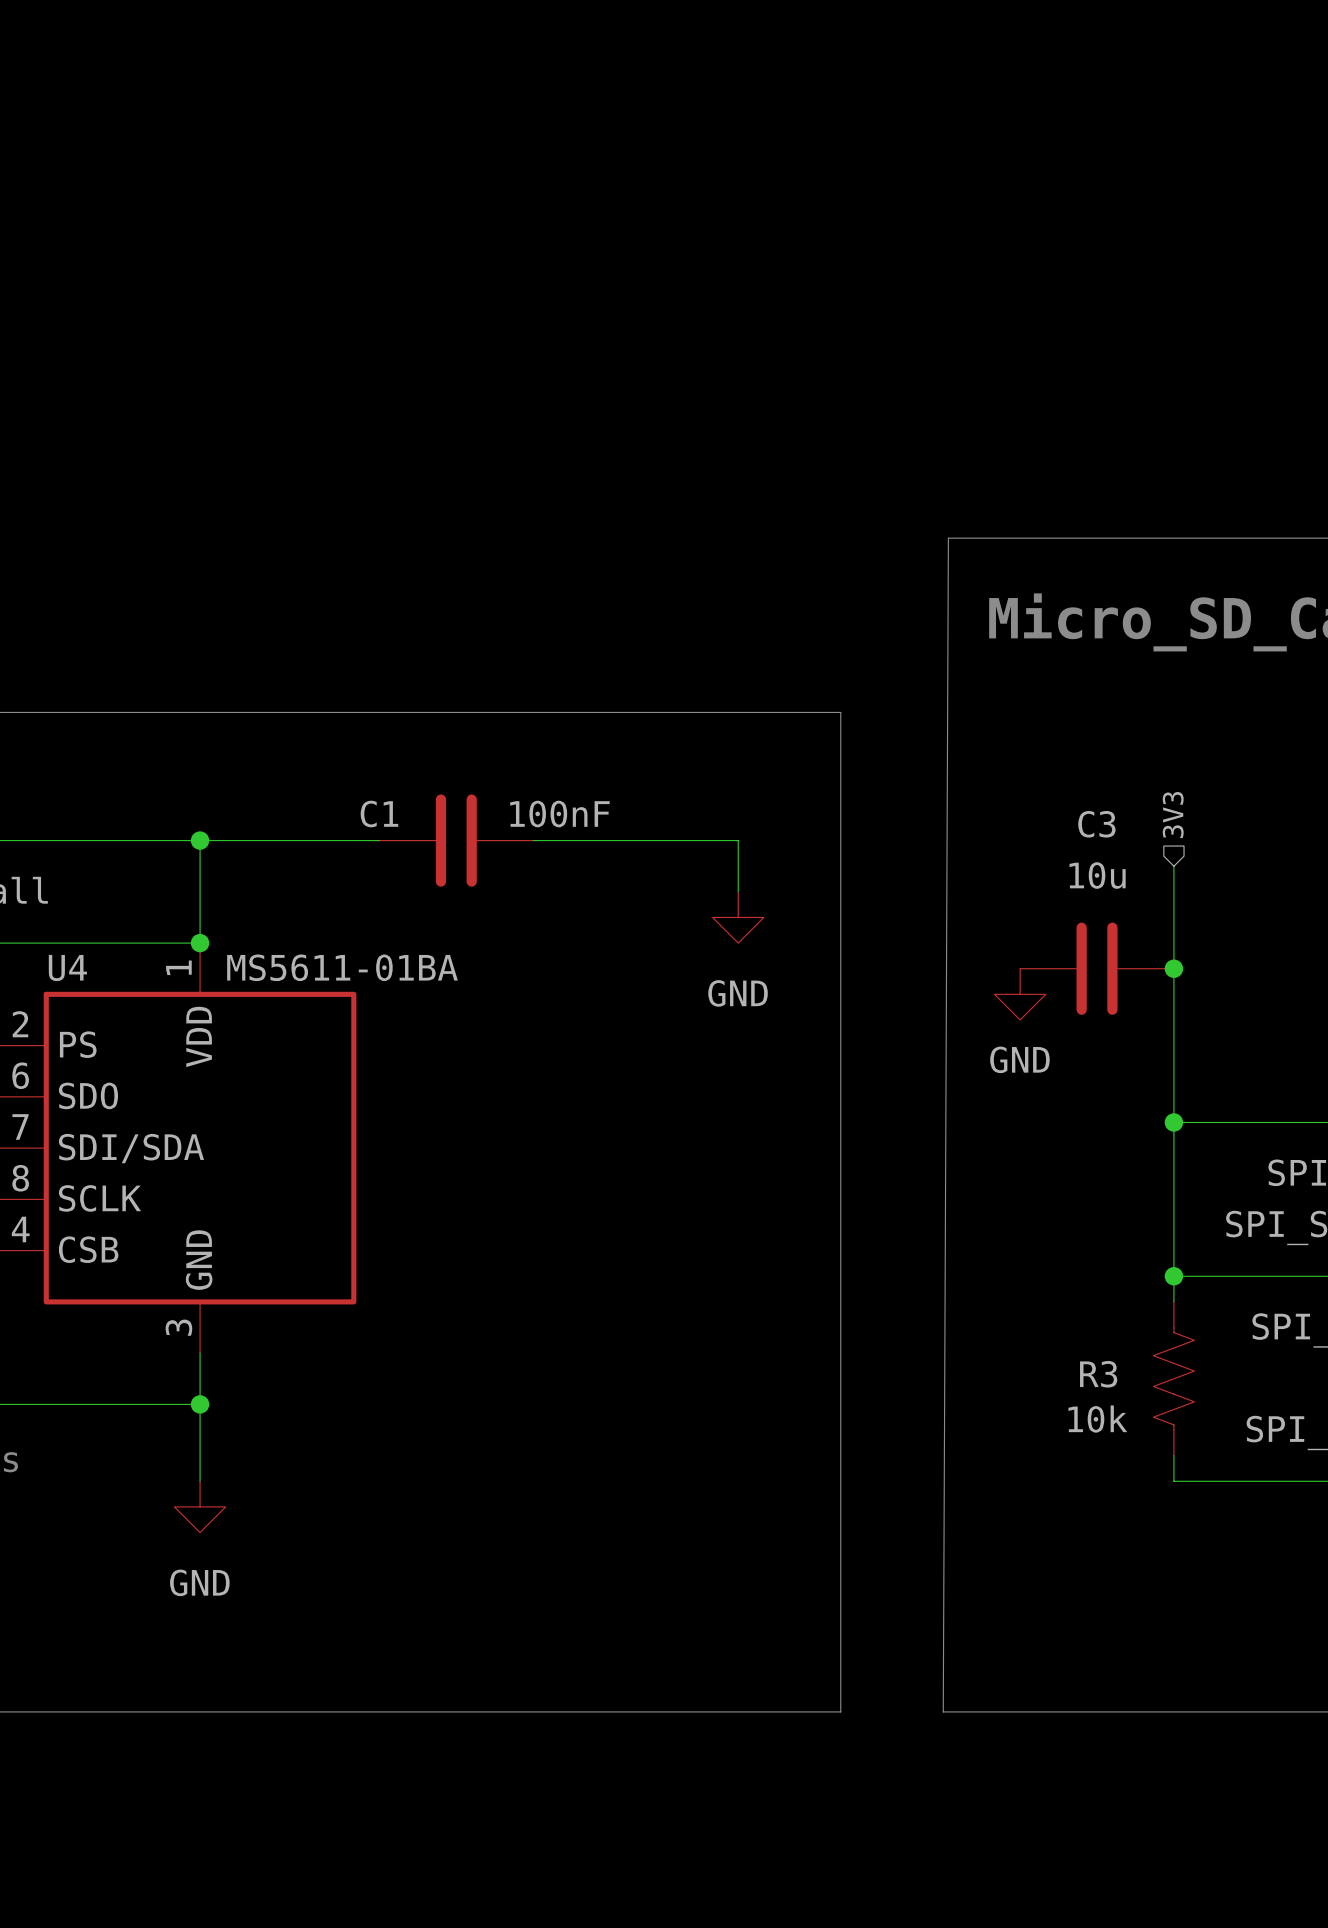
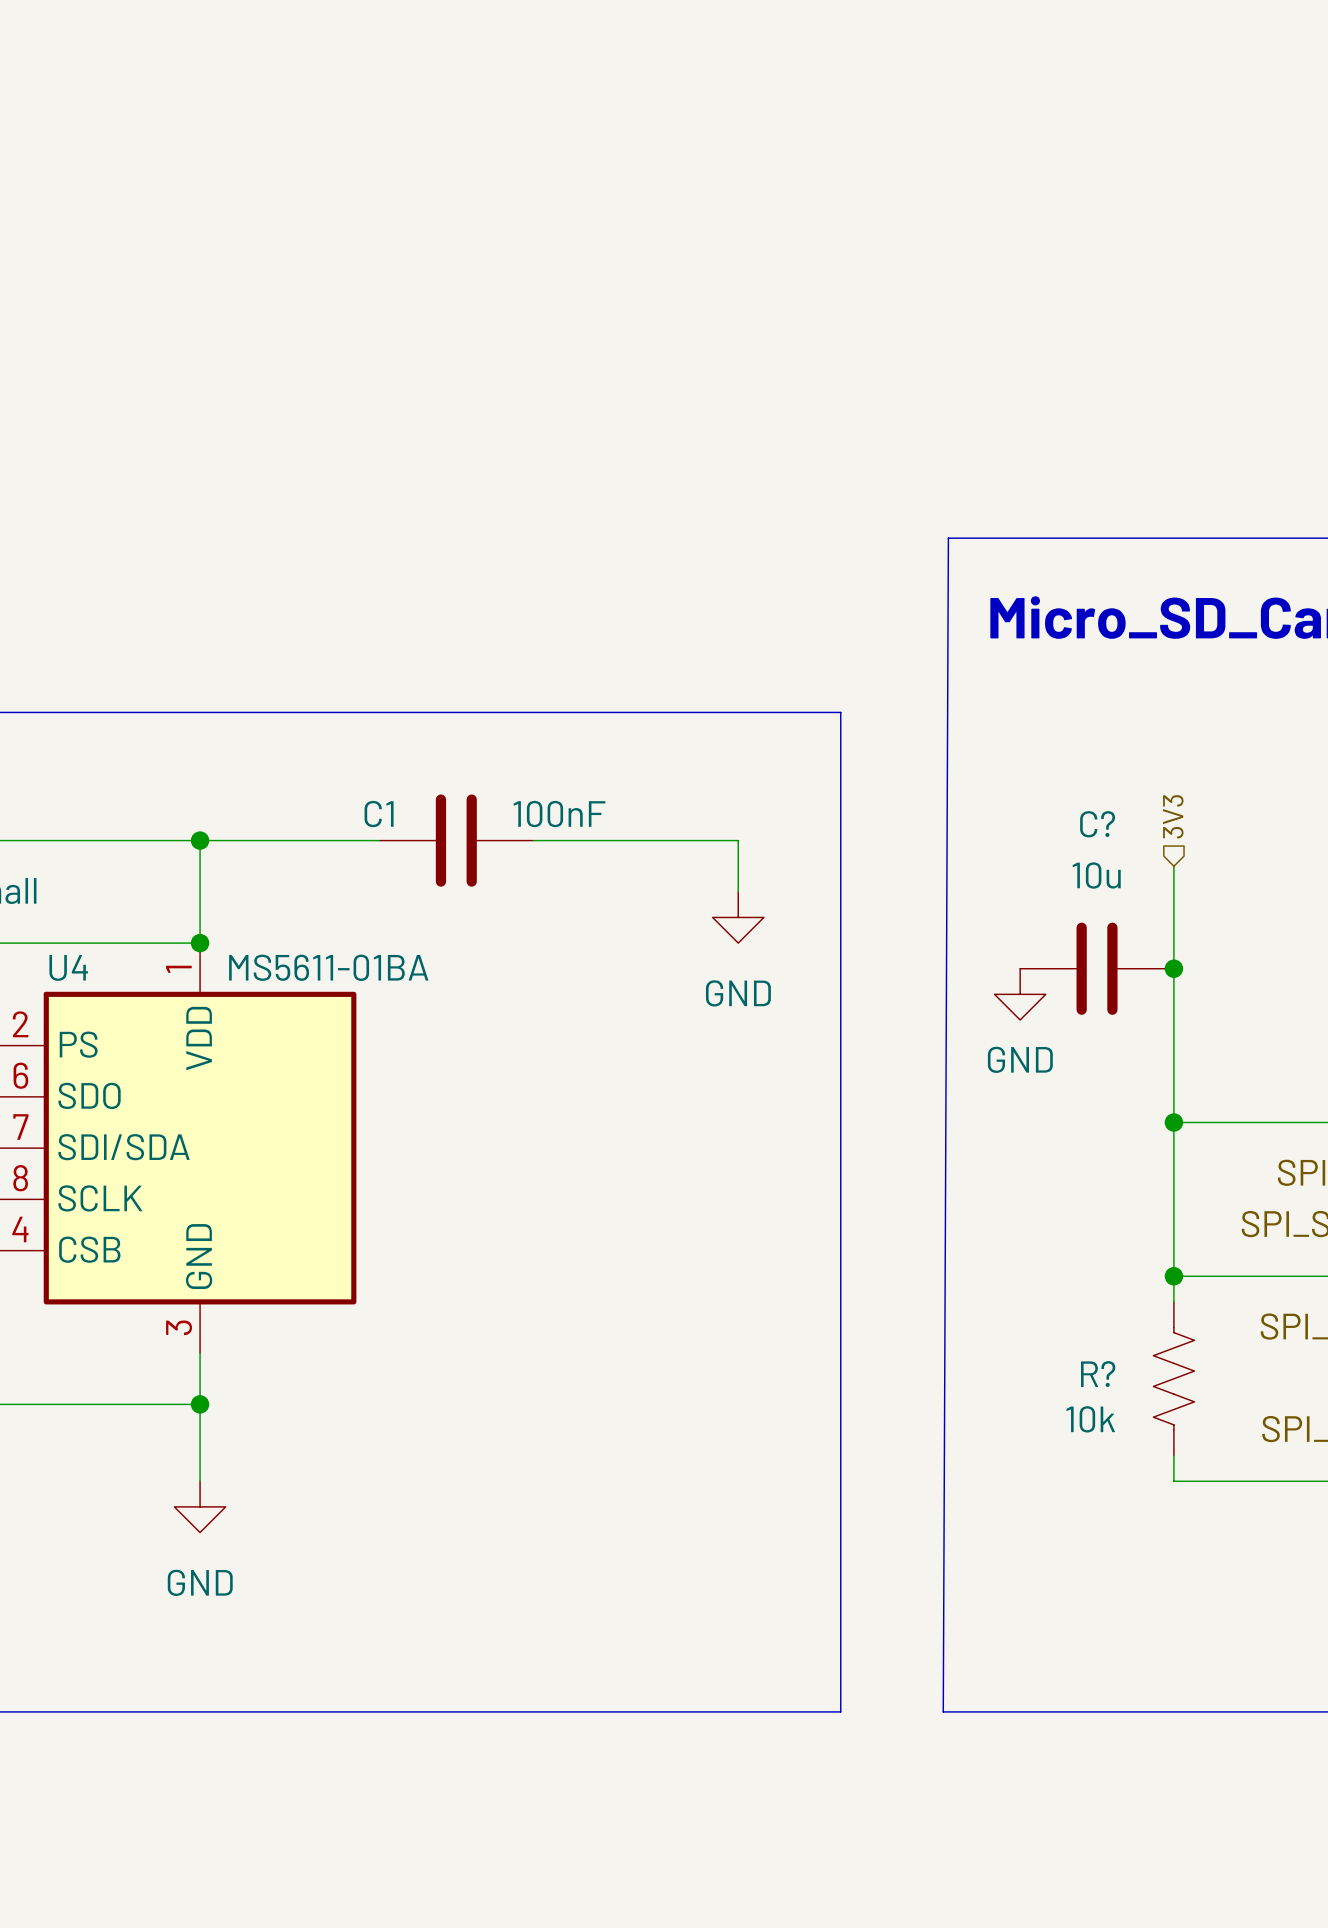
C3 name: C3 (1096, 824) -> C? (1097, 824)
R3 name: R3 (1098, 1374) -> R? (1098, 1374)

